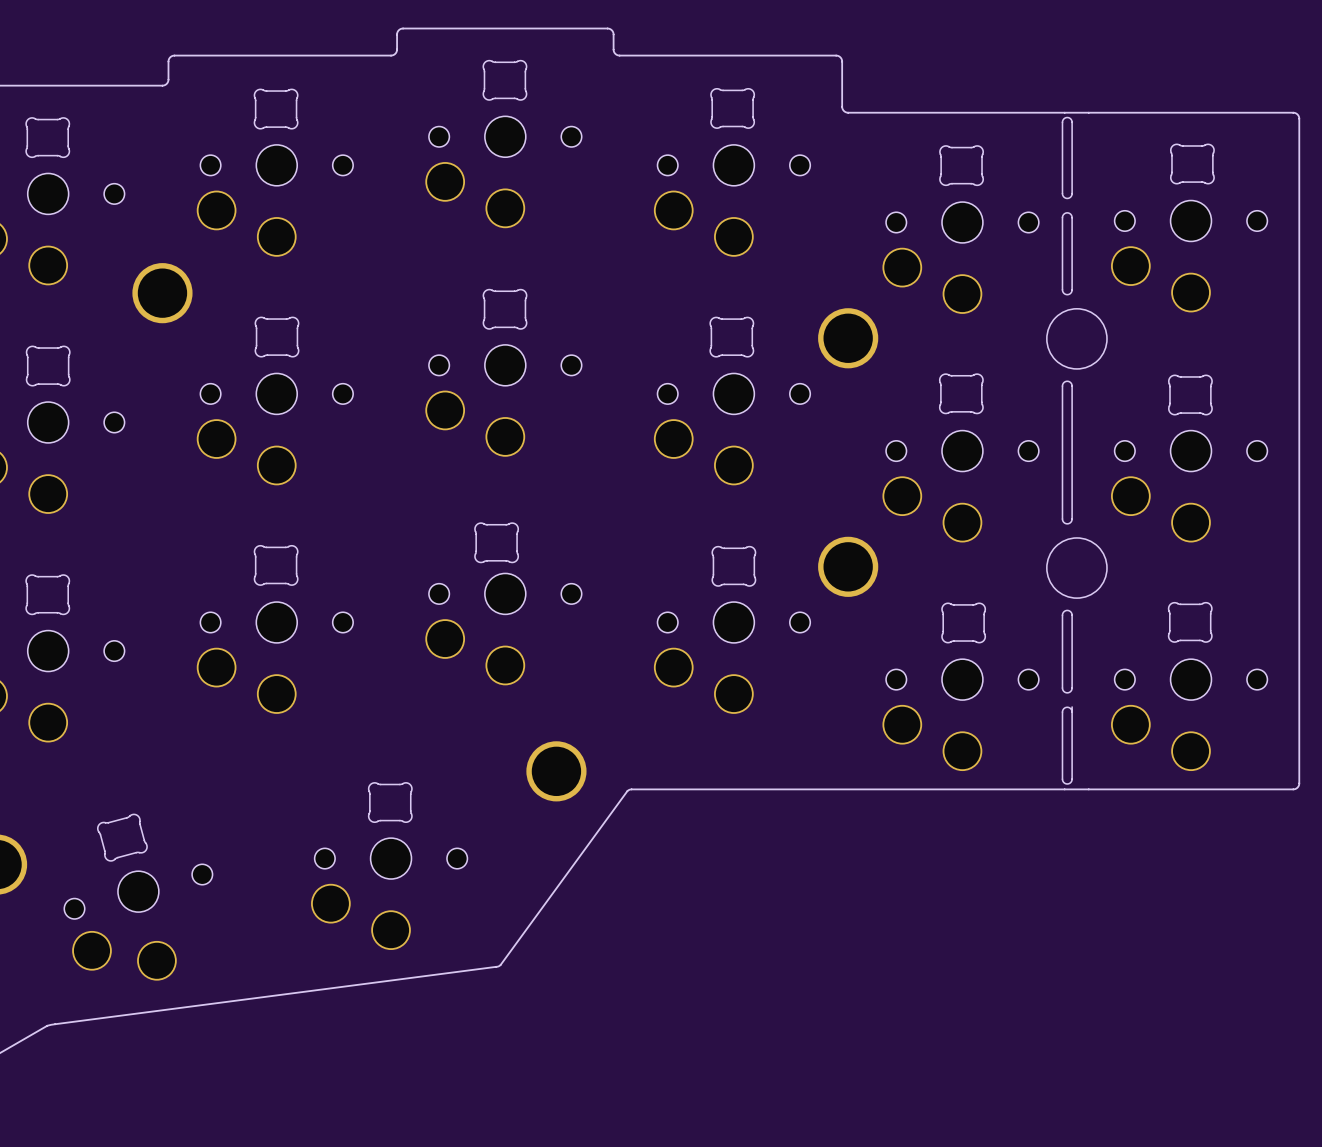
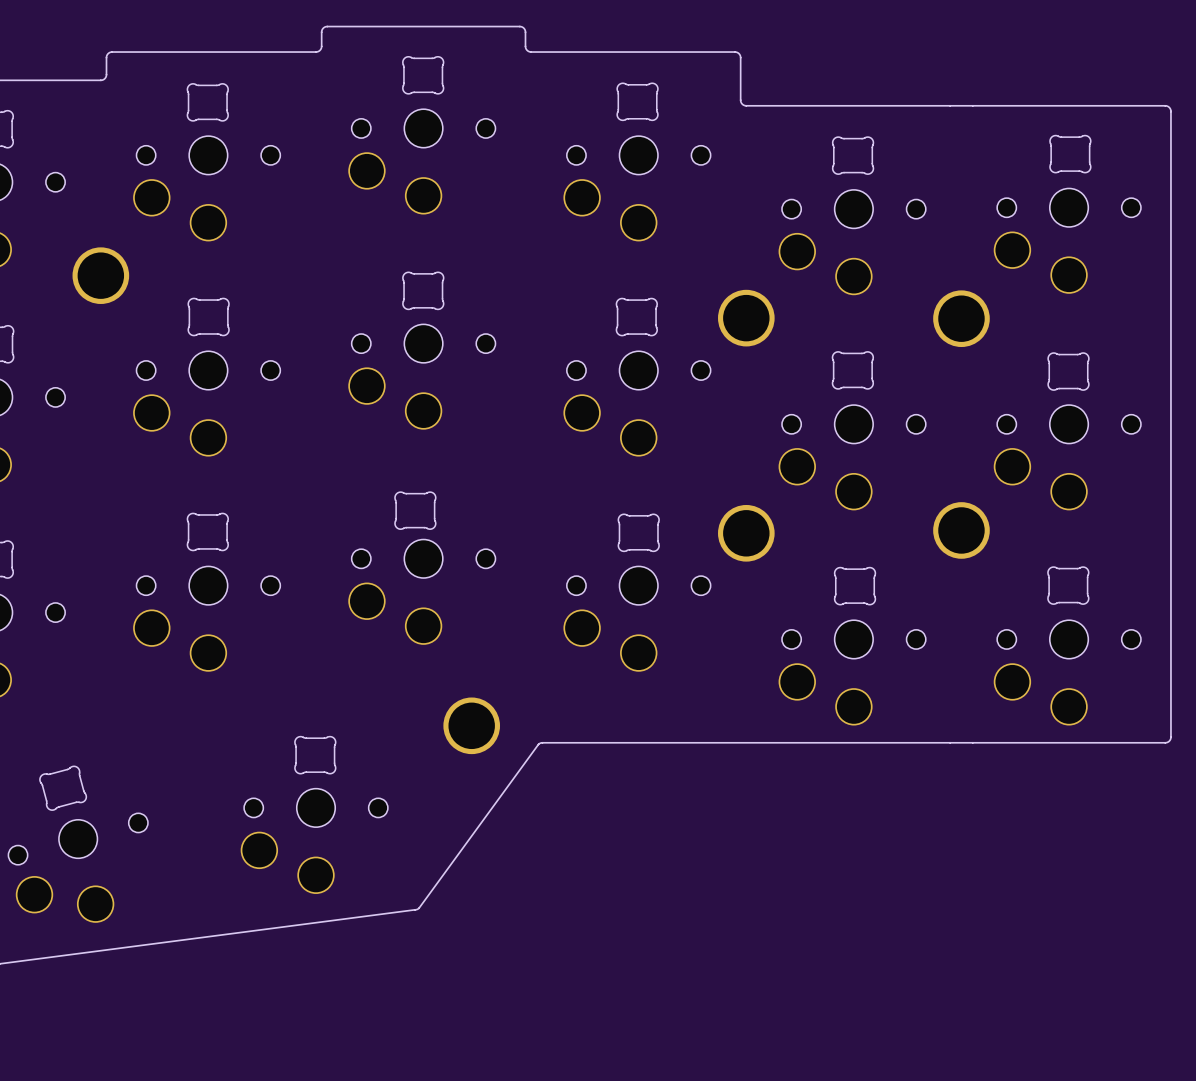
board edge: (1062, 122) (1062, 194) (1067, 198) (1072, 193) (1072, 121) (1066, 117) (1062, 122) -> none
board edge: (1062, 217) (1062, 290) (1067, 294) (1072, 289) (1072, 217) (1066, 212) (1062, 217) -> none
round board edge: [1046, 308, 1108, 370] -> none
part: none -> (961, 318)
board edge: (1062, 386) (1062, 519) (1067, 523) (1072, 519) (1072, 386) (1067, 381) (1062, 386) -> none
round board edge: [1046, 537, 1108, 599] -> none
part: none -> (961, 530)
board edge: (1062, 615) (1062, 688) (1067, 692) (1072, 688) (1072, 614) (1067, 610) (1062, 615) -> none
board edge: (1072, 706) (1072, 779) (1072, 779) (1066, 783) (1062, 779) (1062, 711) (1067, 707) (1072, 712) -> none

